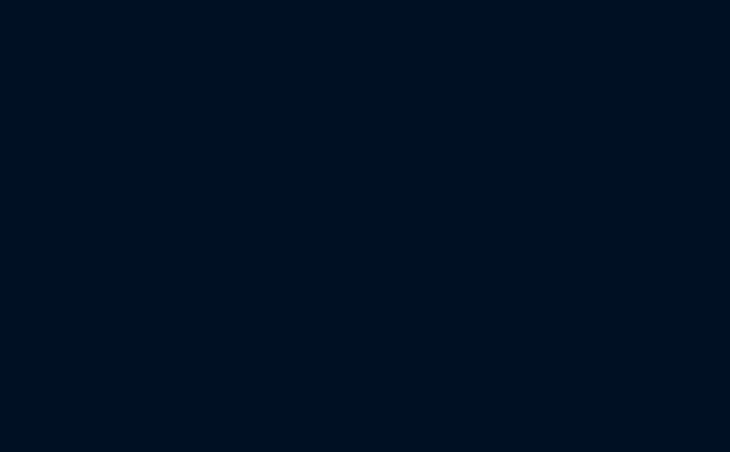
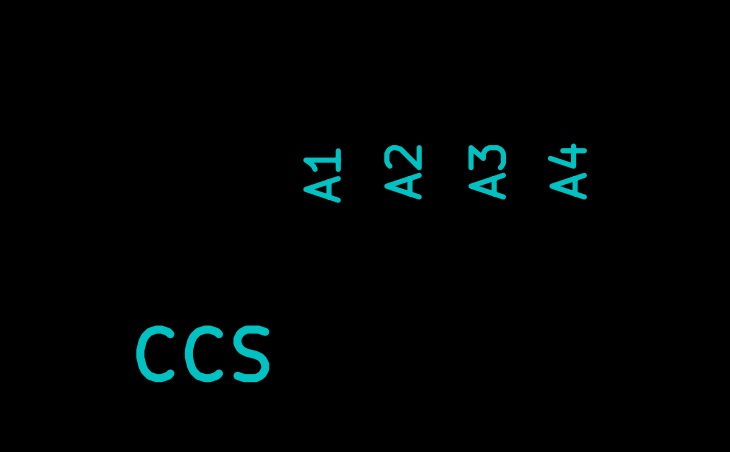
text: none -> A3 (487, 172)
text: none -> A4 (567, 171)
text: none -> A2 (403, 172)
text: none -> A1 (322, 175)
text: none -> CCS (202, 353)

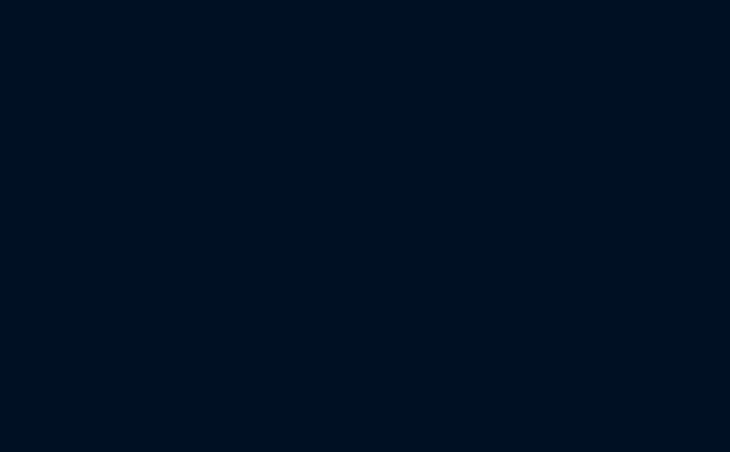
text: A4 (567, 171) -> none
text: A2 (403, 172) -> none
text: A3 (487, 172) -> none
text: A1 (322, 175) -> none
text: CCS (202, 353) -> none

